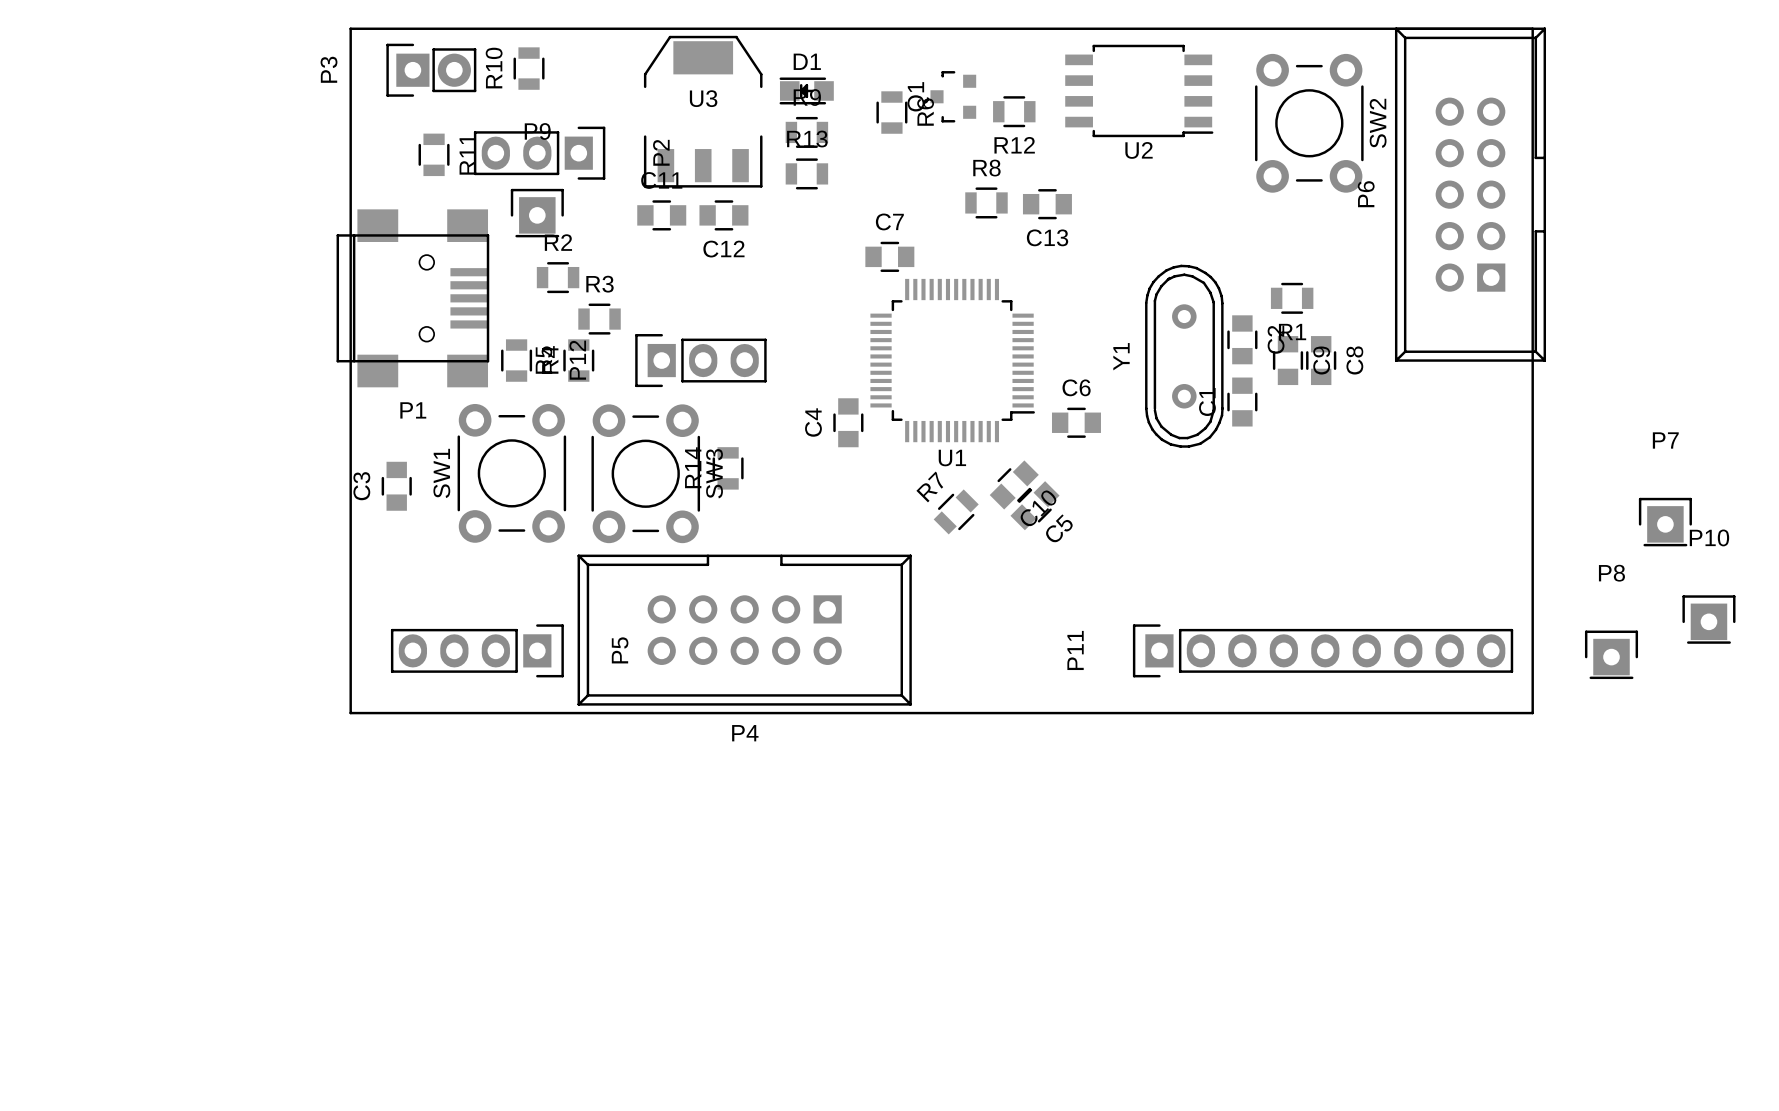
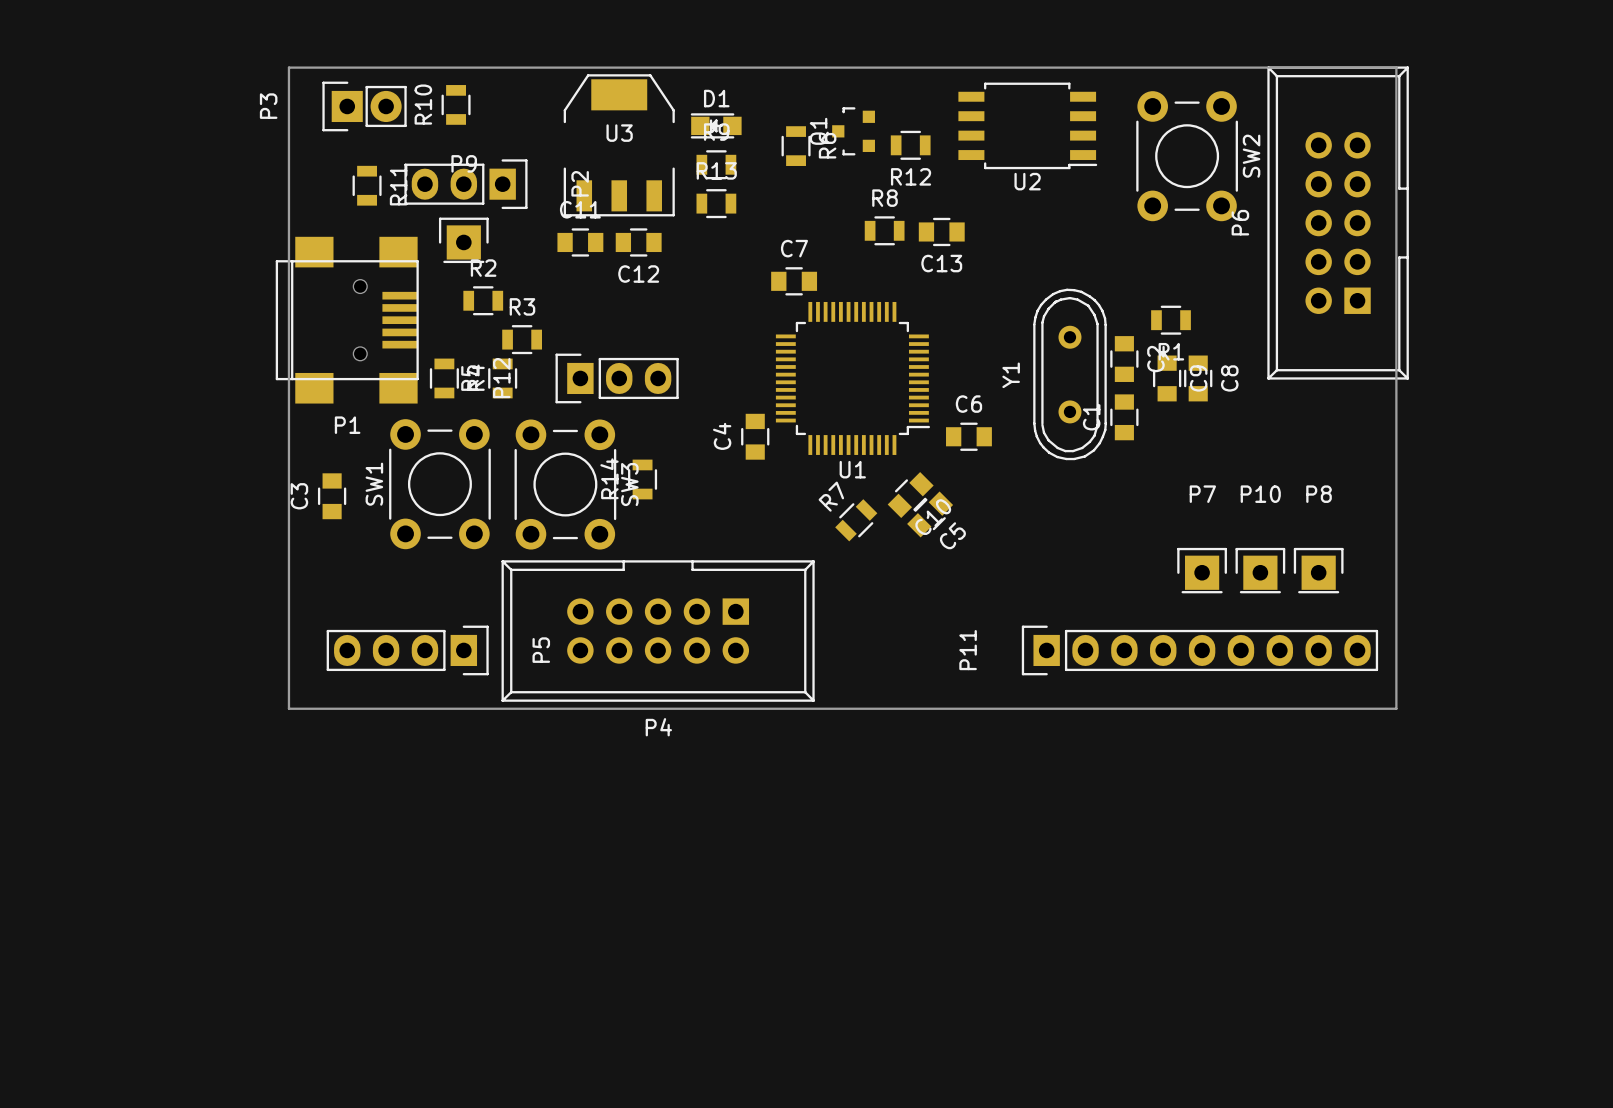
P7 position: (1665, 522) -> (1202, 570)
P10 position: (1708, 619) -> (1260, 570)
P8 position: (1611, 654) -> (1318, 570)

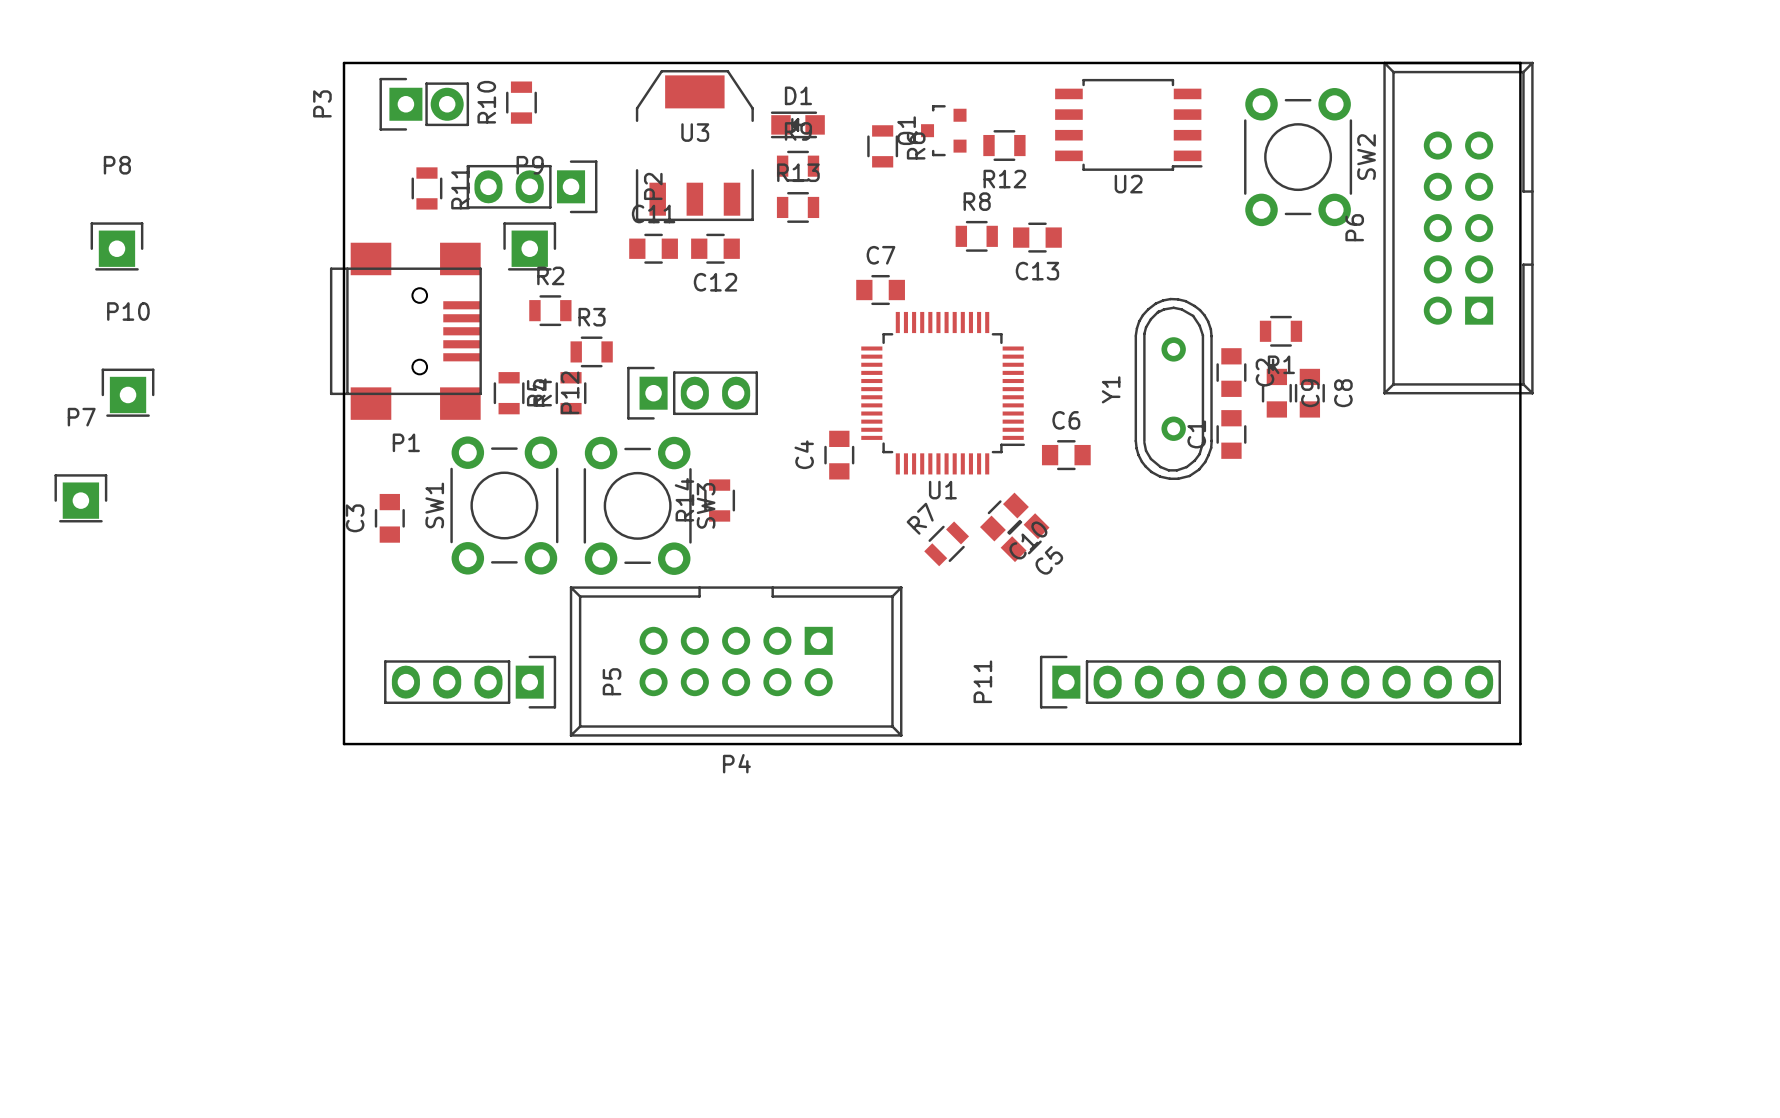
P7 position: (1202, 570) -> (80, 498)
P10 position: (1260, 570) -> (128, 392)
P8 position: (1318, 570) -> (116, 246)
P11 footprint: [1021, 625, 1379, 676] -> [1039, 655, 1501, 709]
P11 name position: P11 (968, 650) -> P11 (982, 681)

